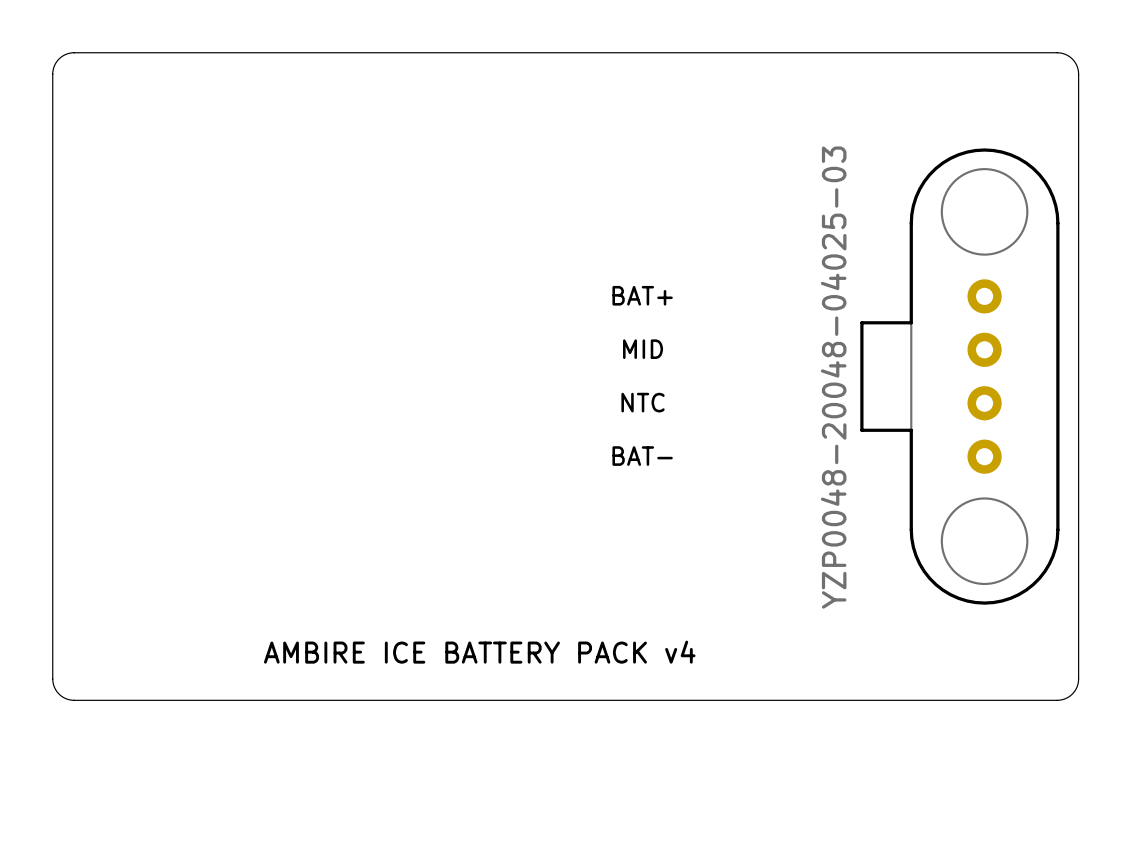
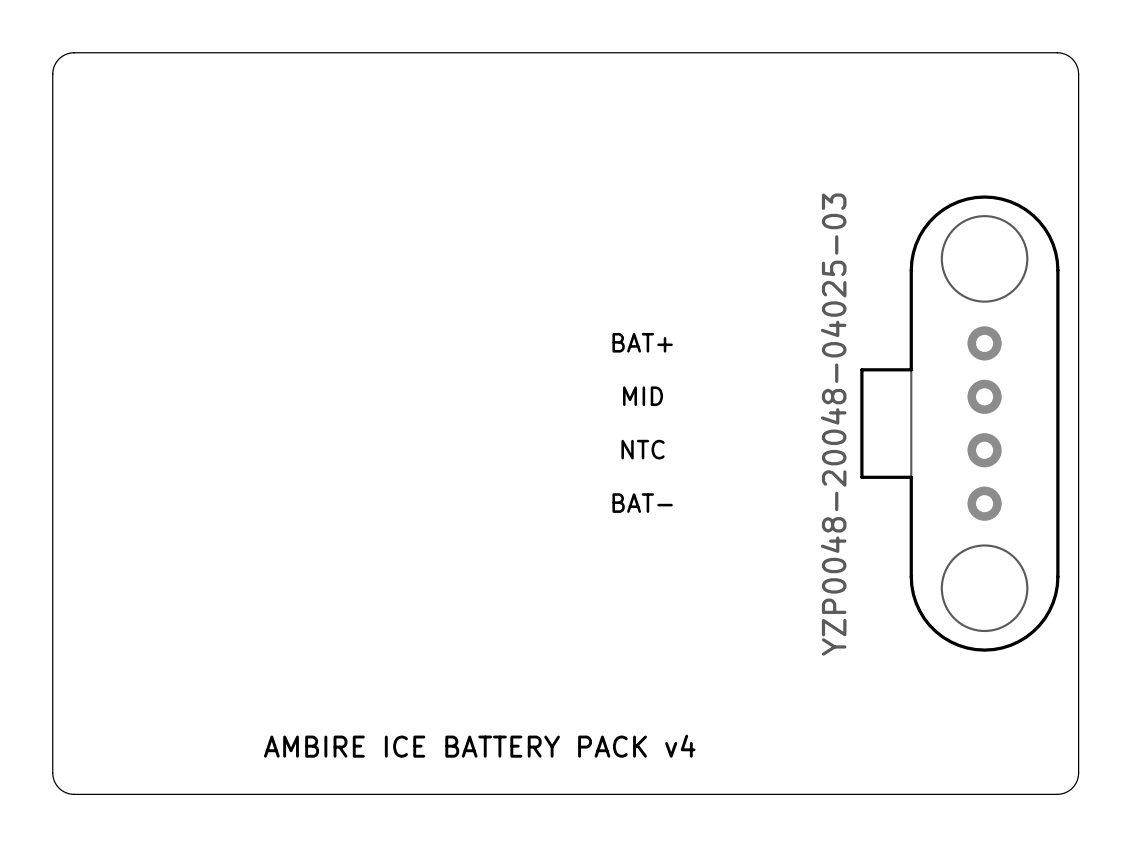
text position: BAT+ (642, 295) -> BAT+ (642, 342)
text position: MID (643, 349) -> MID (643, 396)
part position: (959, 376) -> (959, 423)
text position: NTC (643, 402) -> NTC (643, 449)
text position: BAT- (642, 456) -> BAT- (642, 503)
text position: AMBIRE ICE BATTERY PACK v4 (479, 652) -> AMBIRE ICE BATTERY PACK v4 (479, 746)
board edge: (52, 678) (54, 687) (59, 694) (65, 698) (74, 700) (1057, 700) (1065, 698) (1072, 694) (1076, 687) (1078, 678) -> (52, 678) (52, 775) (59, 788) (65, 792) (74, 794) (1060, 794) (1072, 788) (1078, 775) (1078, 678)

